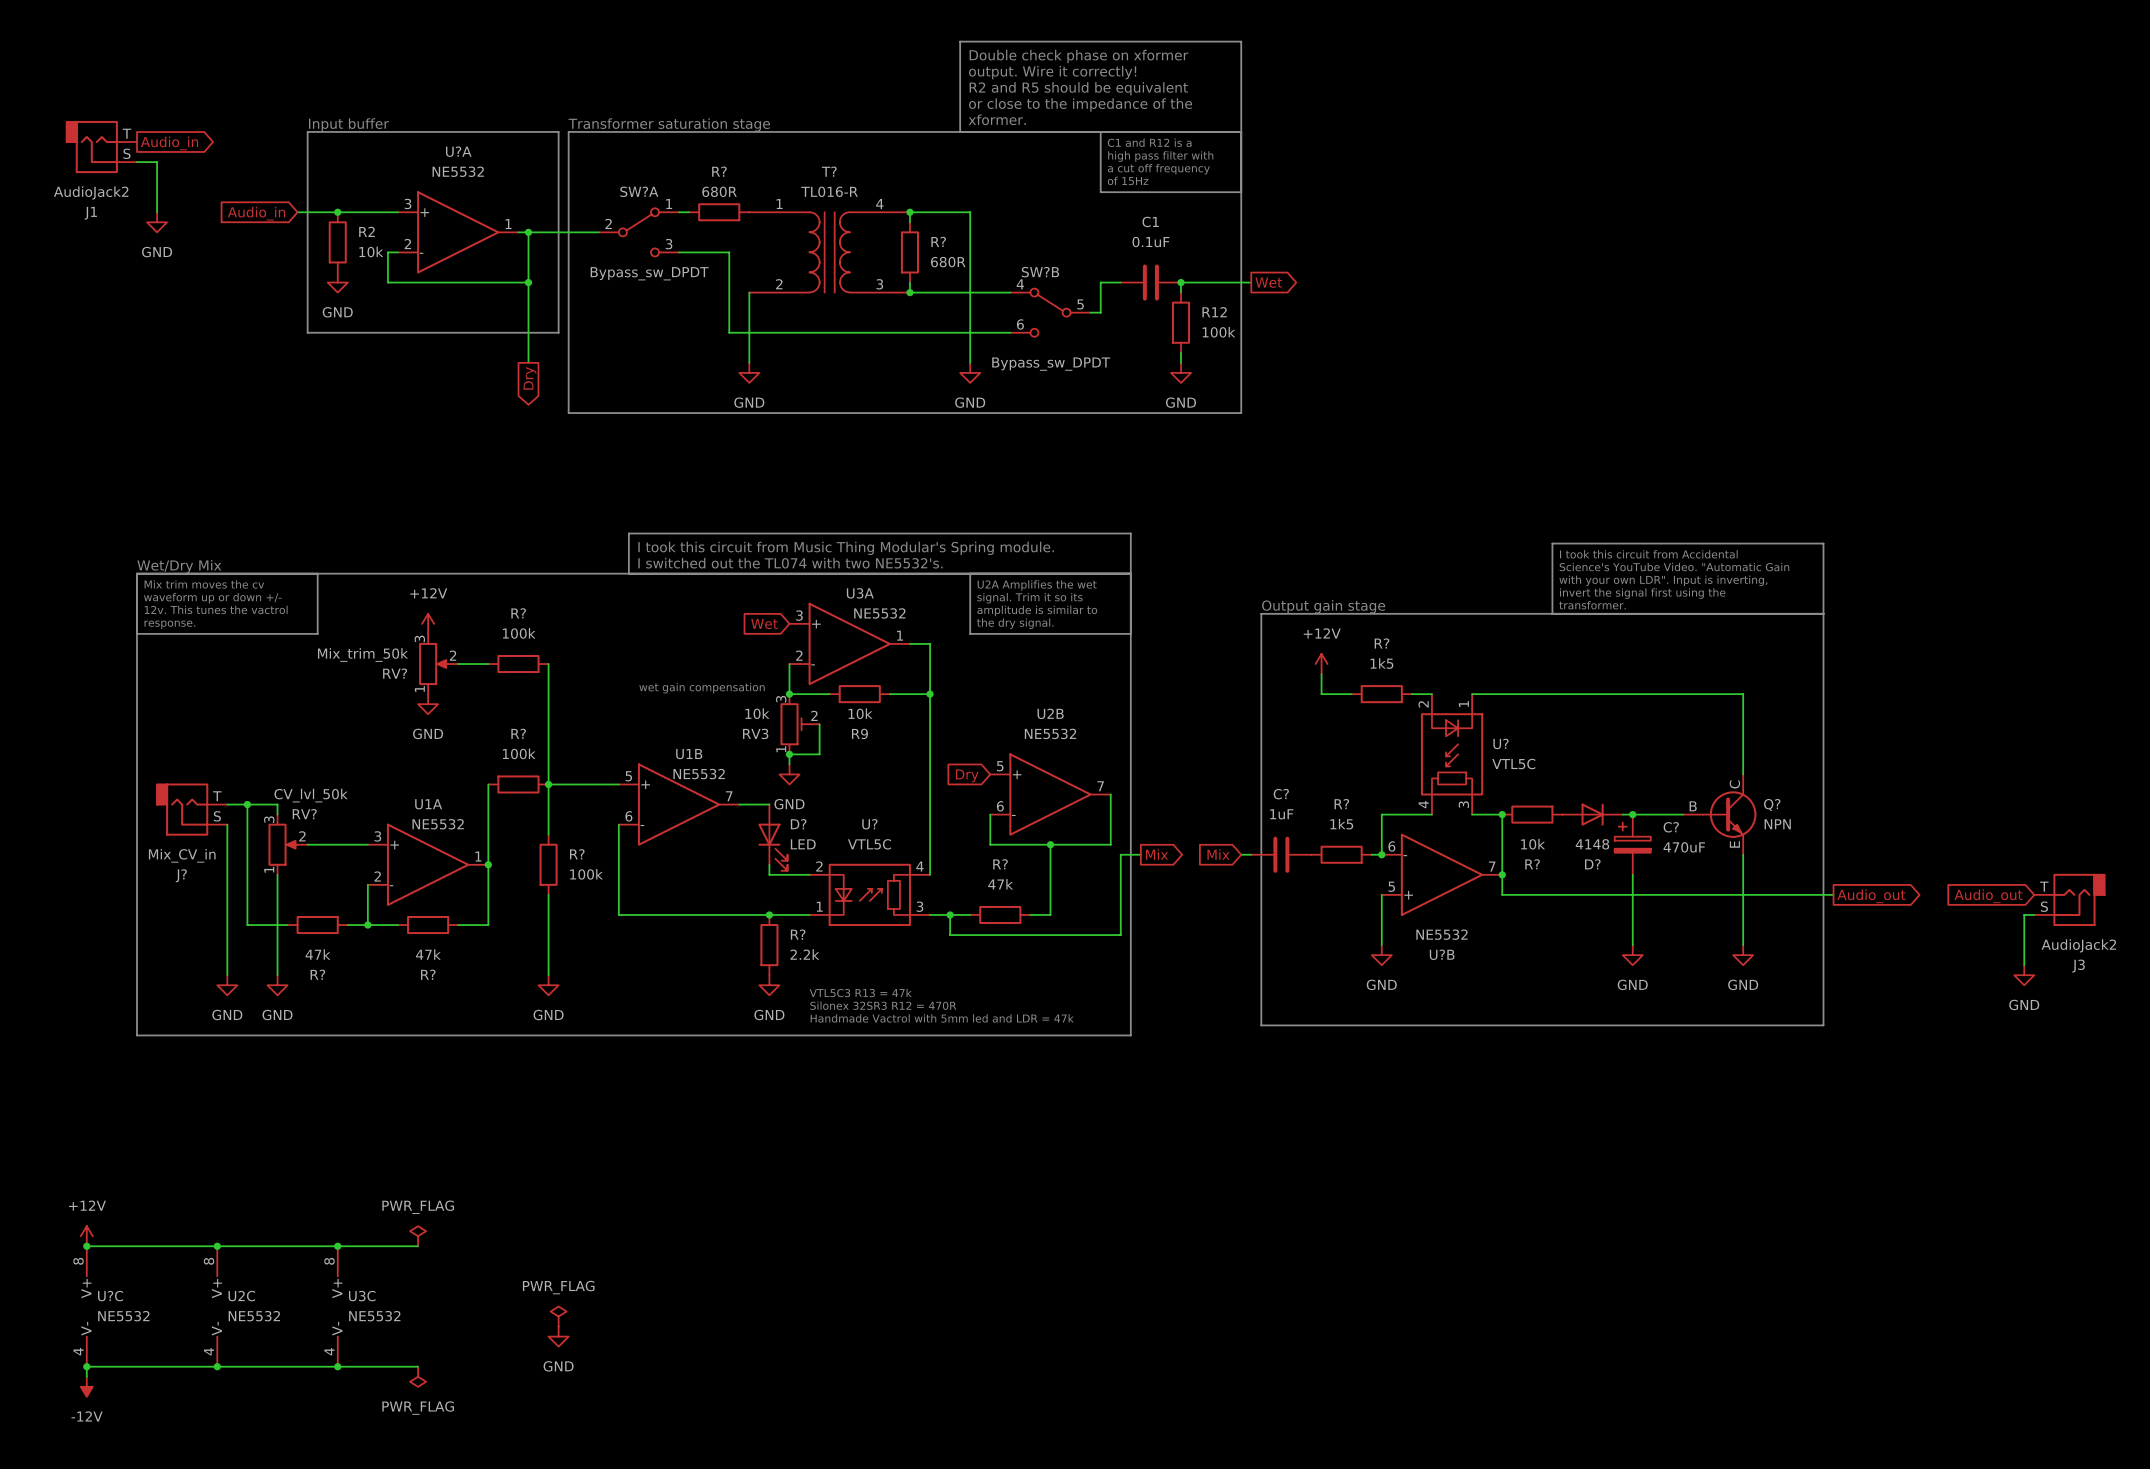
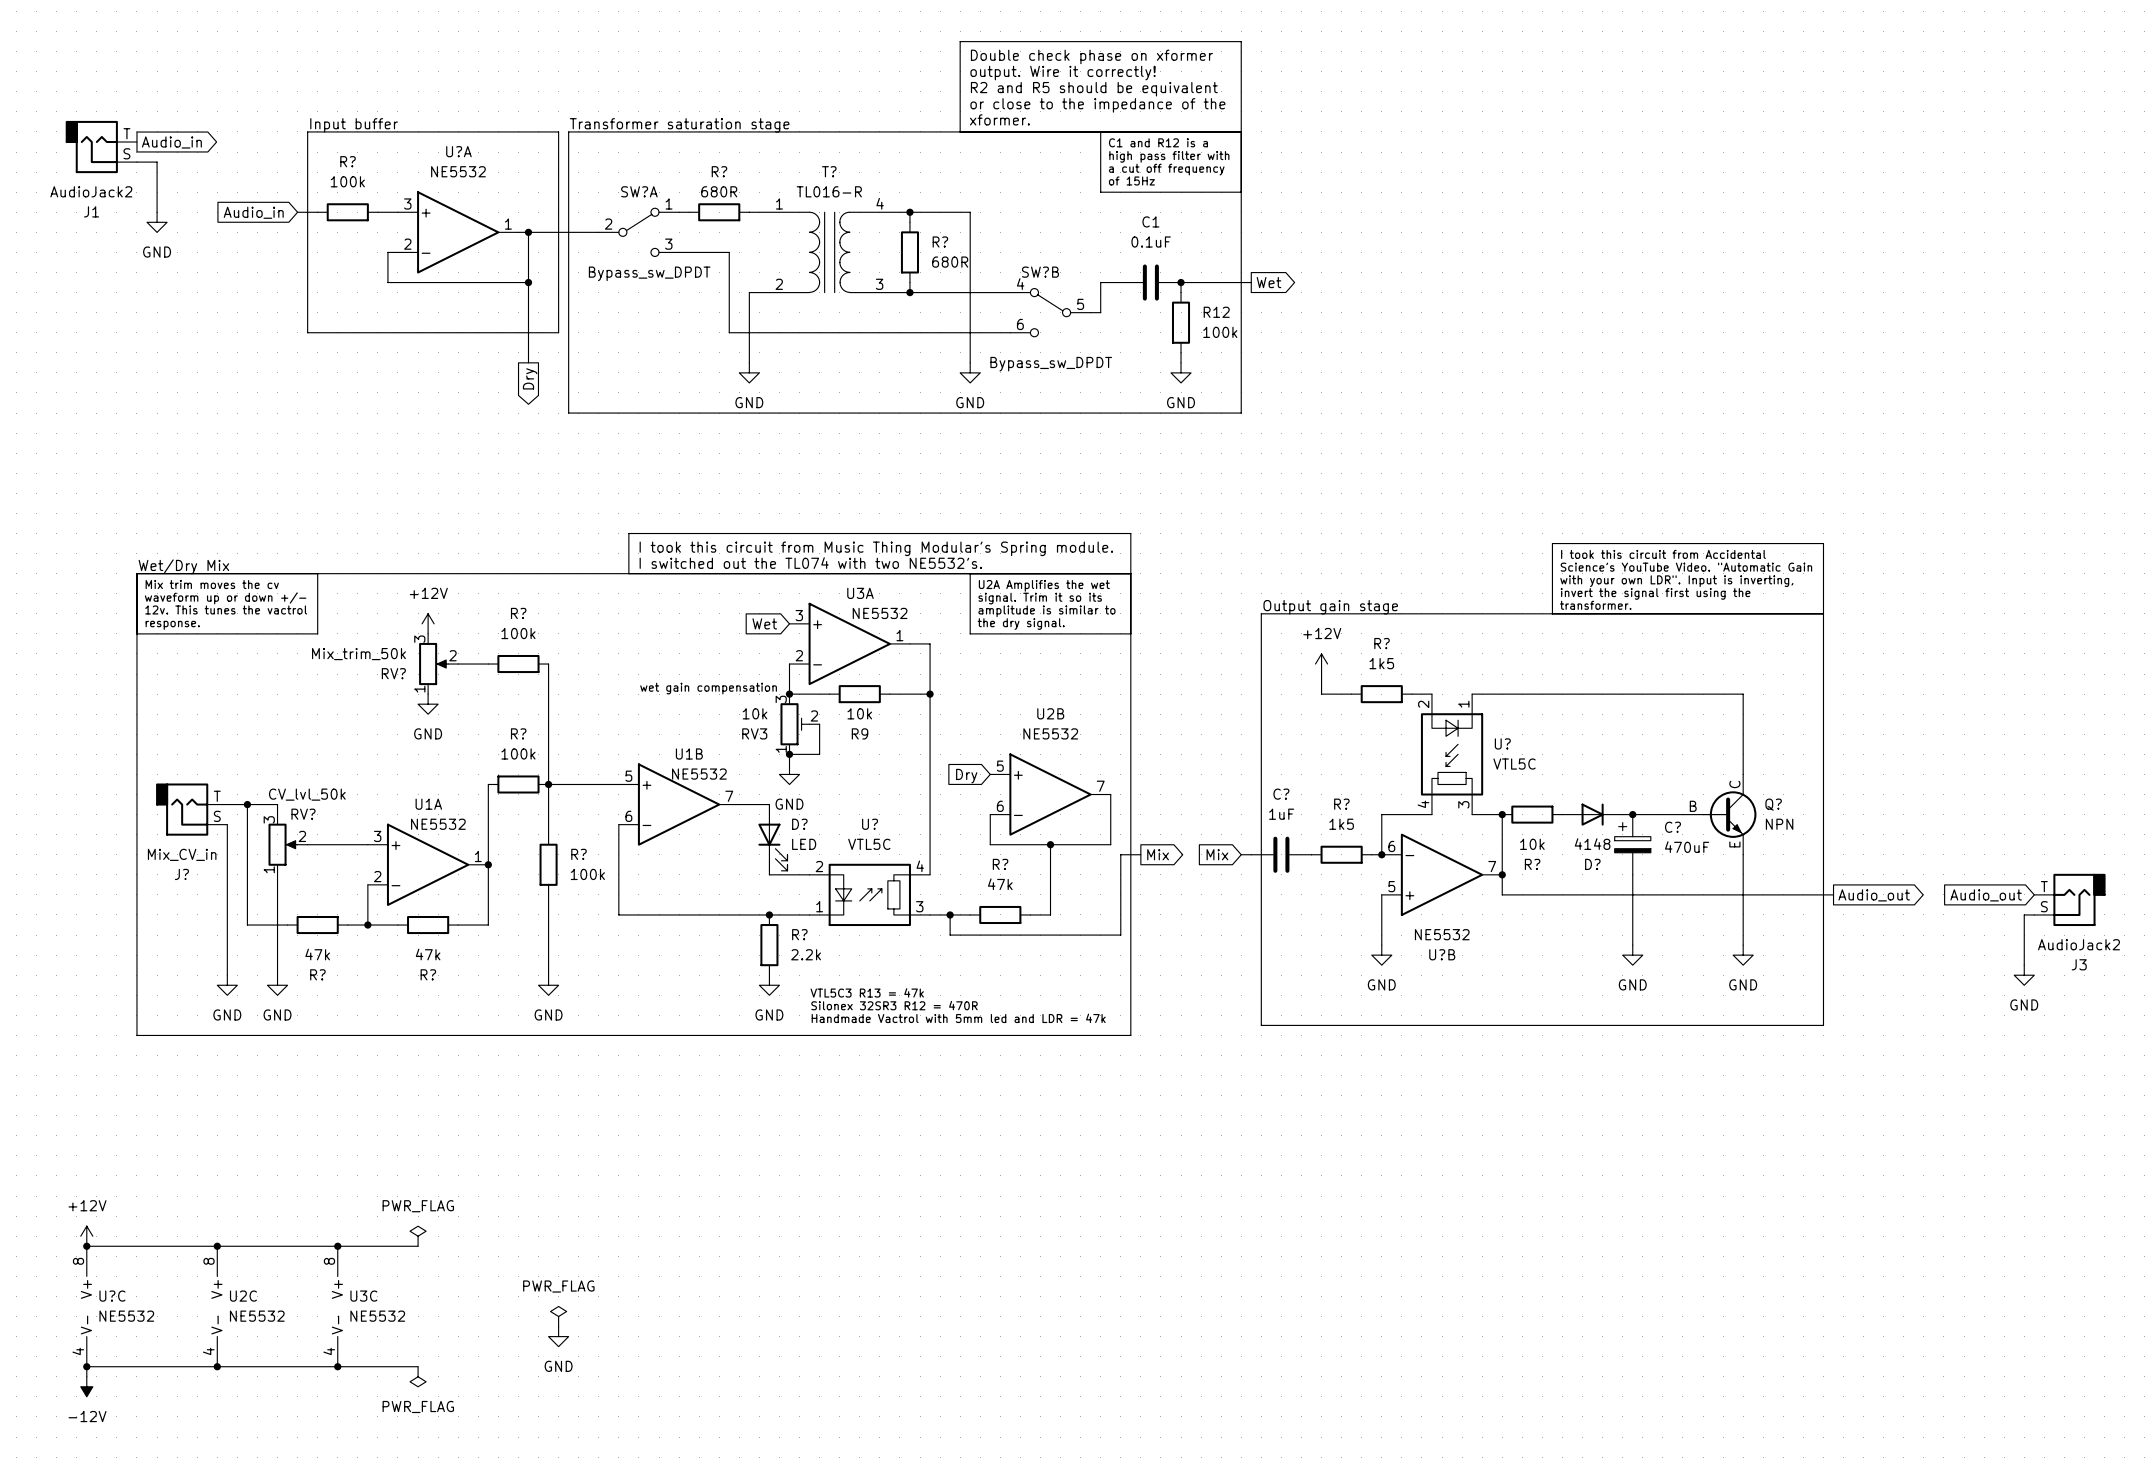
wire: (317, 212) (377, 212) -> none
junction: (337, 212) -> none
R?: none -> 100k (347, 212)
R2: 10k (337, 242) -> none
power symbol: GND (337, 282) -> none

